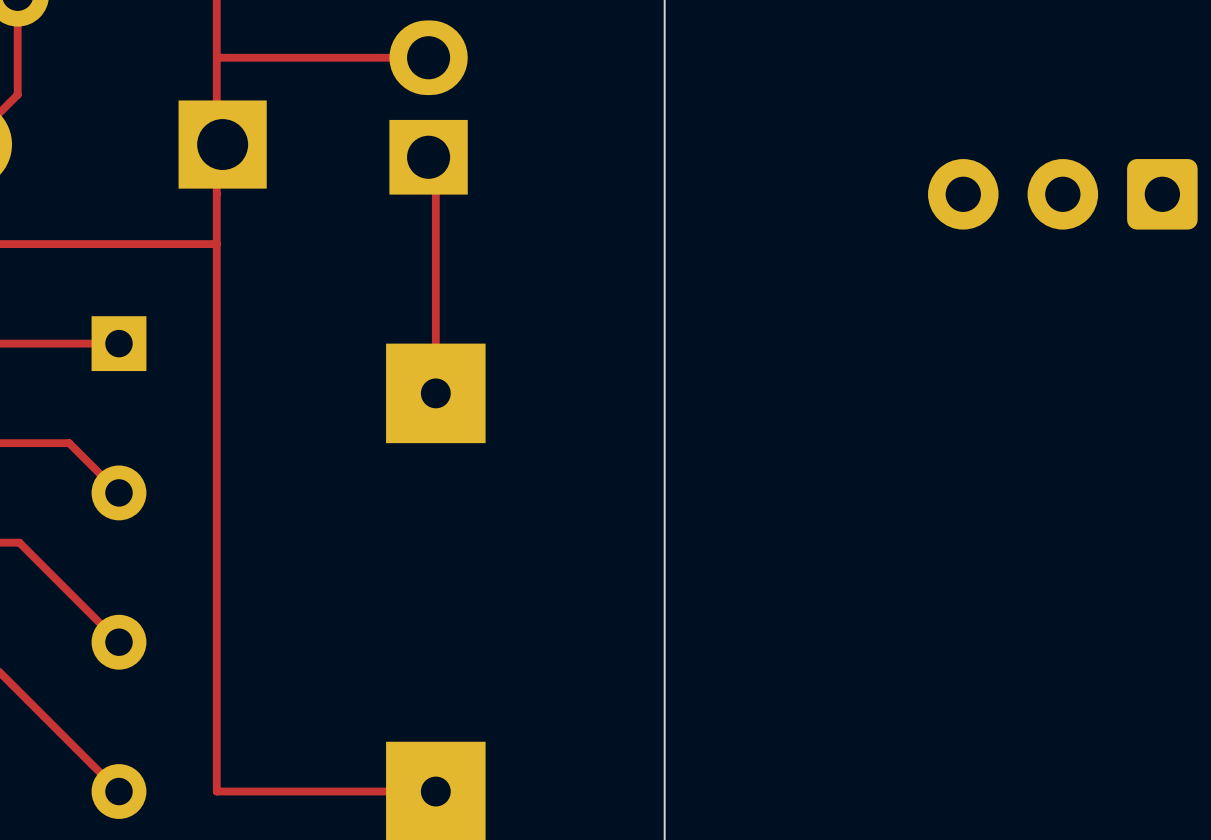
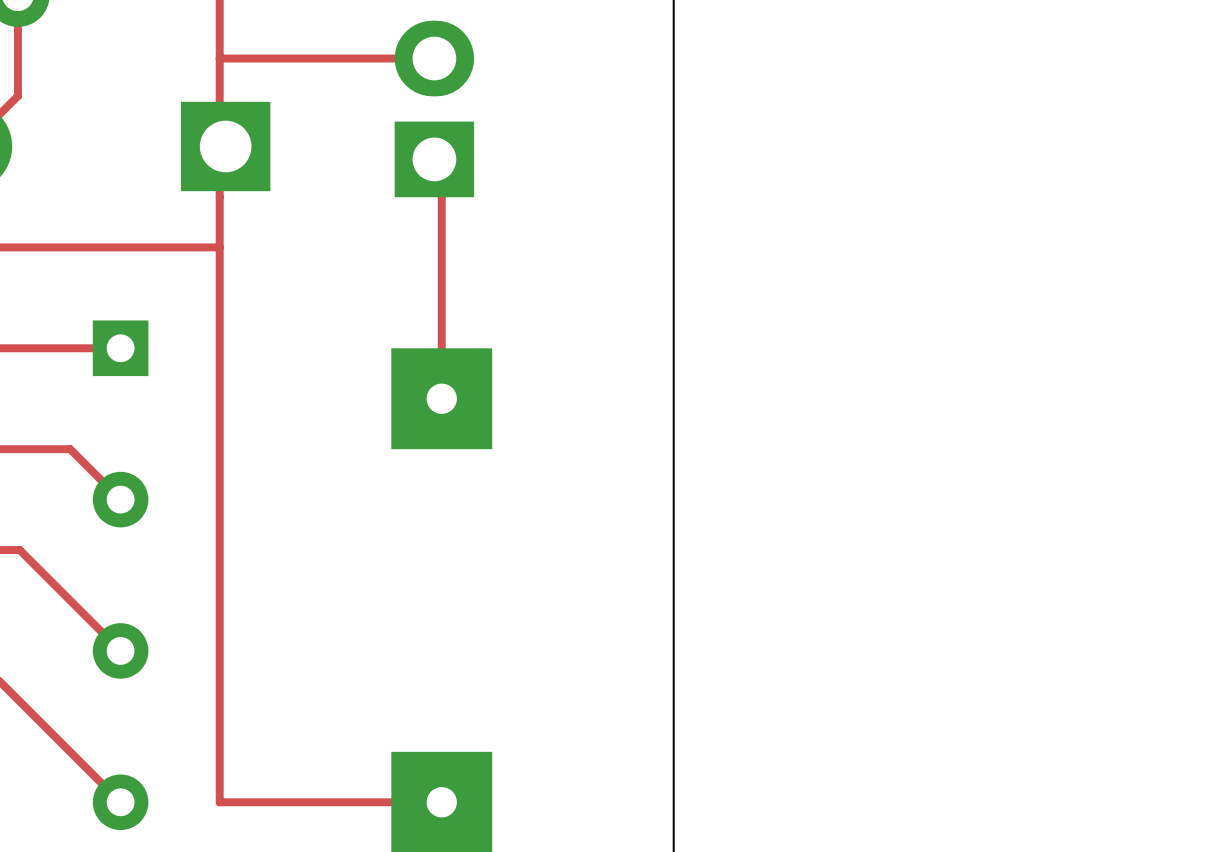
part: (1062, 194) -> none

